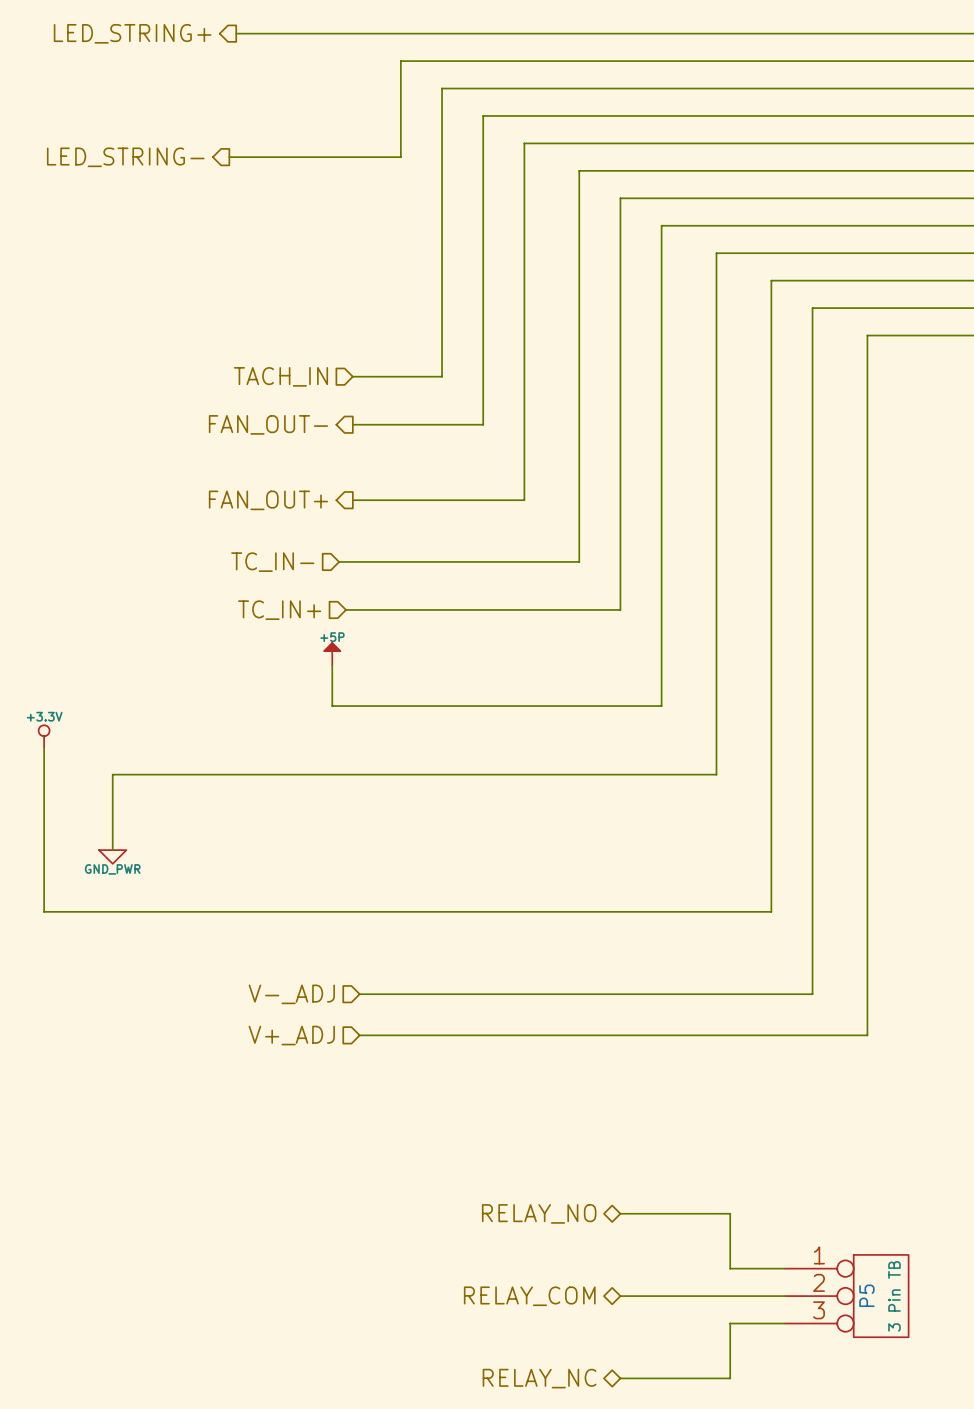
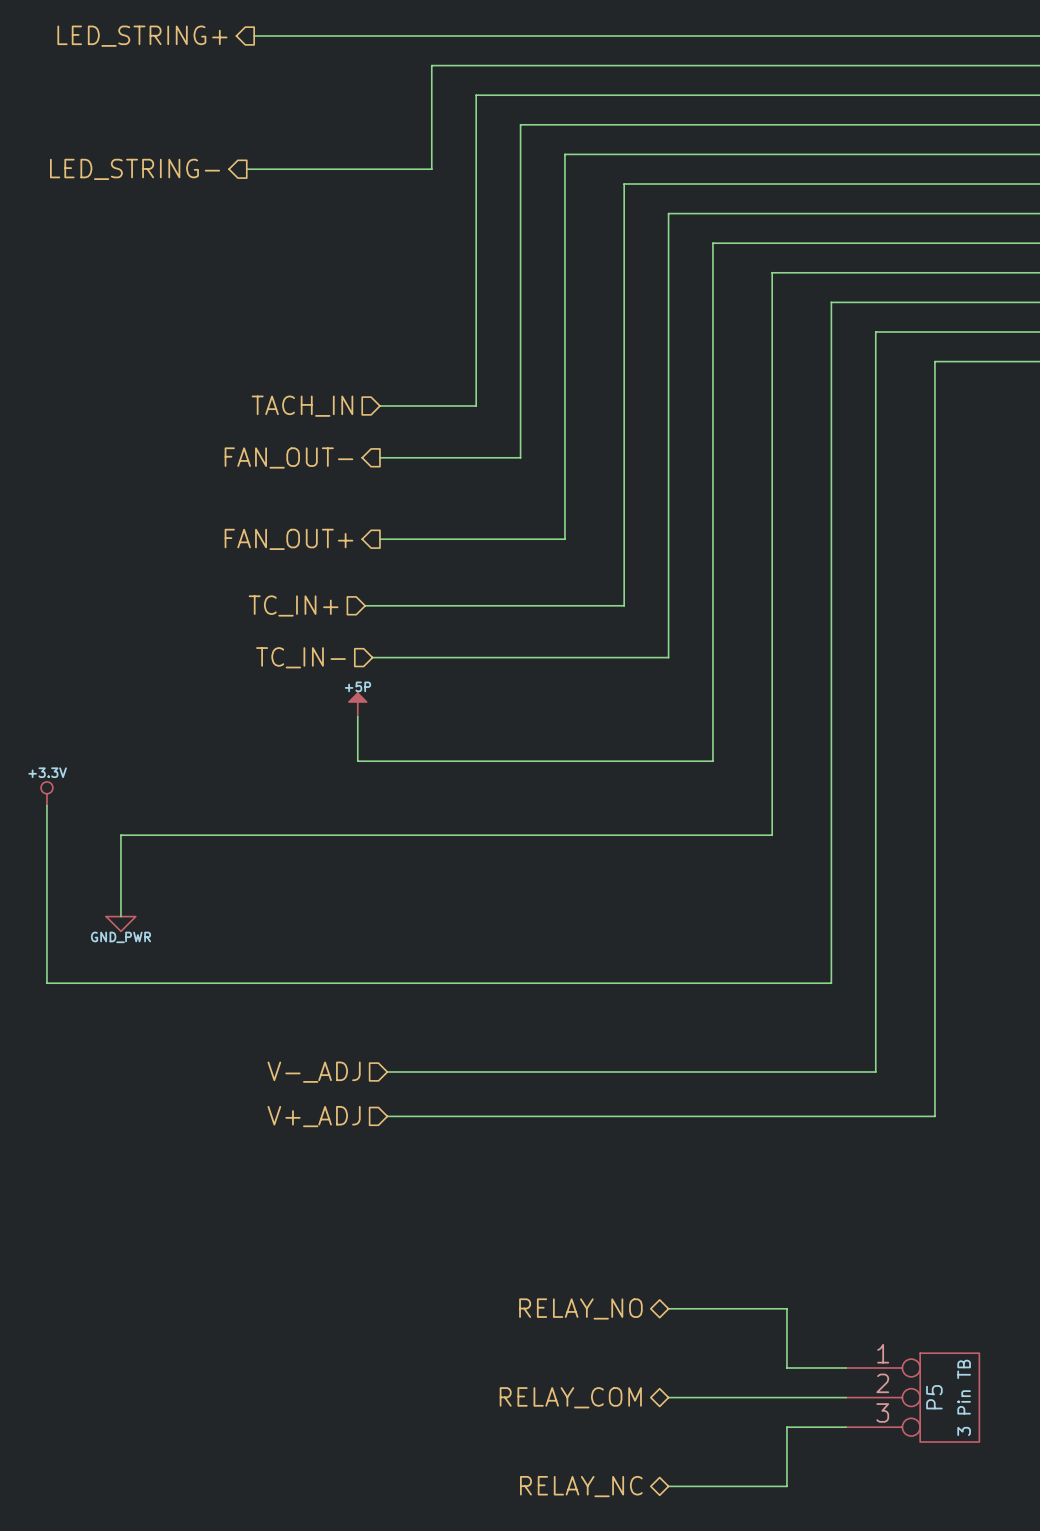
hierarchical label: TC_IN- (272, 562) -> TC_IN+ (293, 605)
hierarchical label: TC_IN+ (279, 610) -> TC_IN- (300, 657)

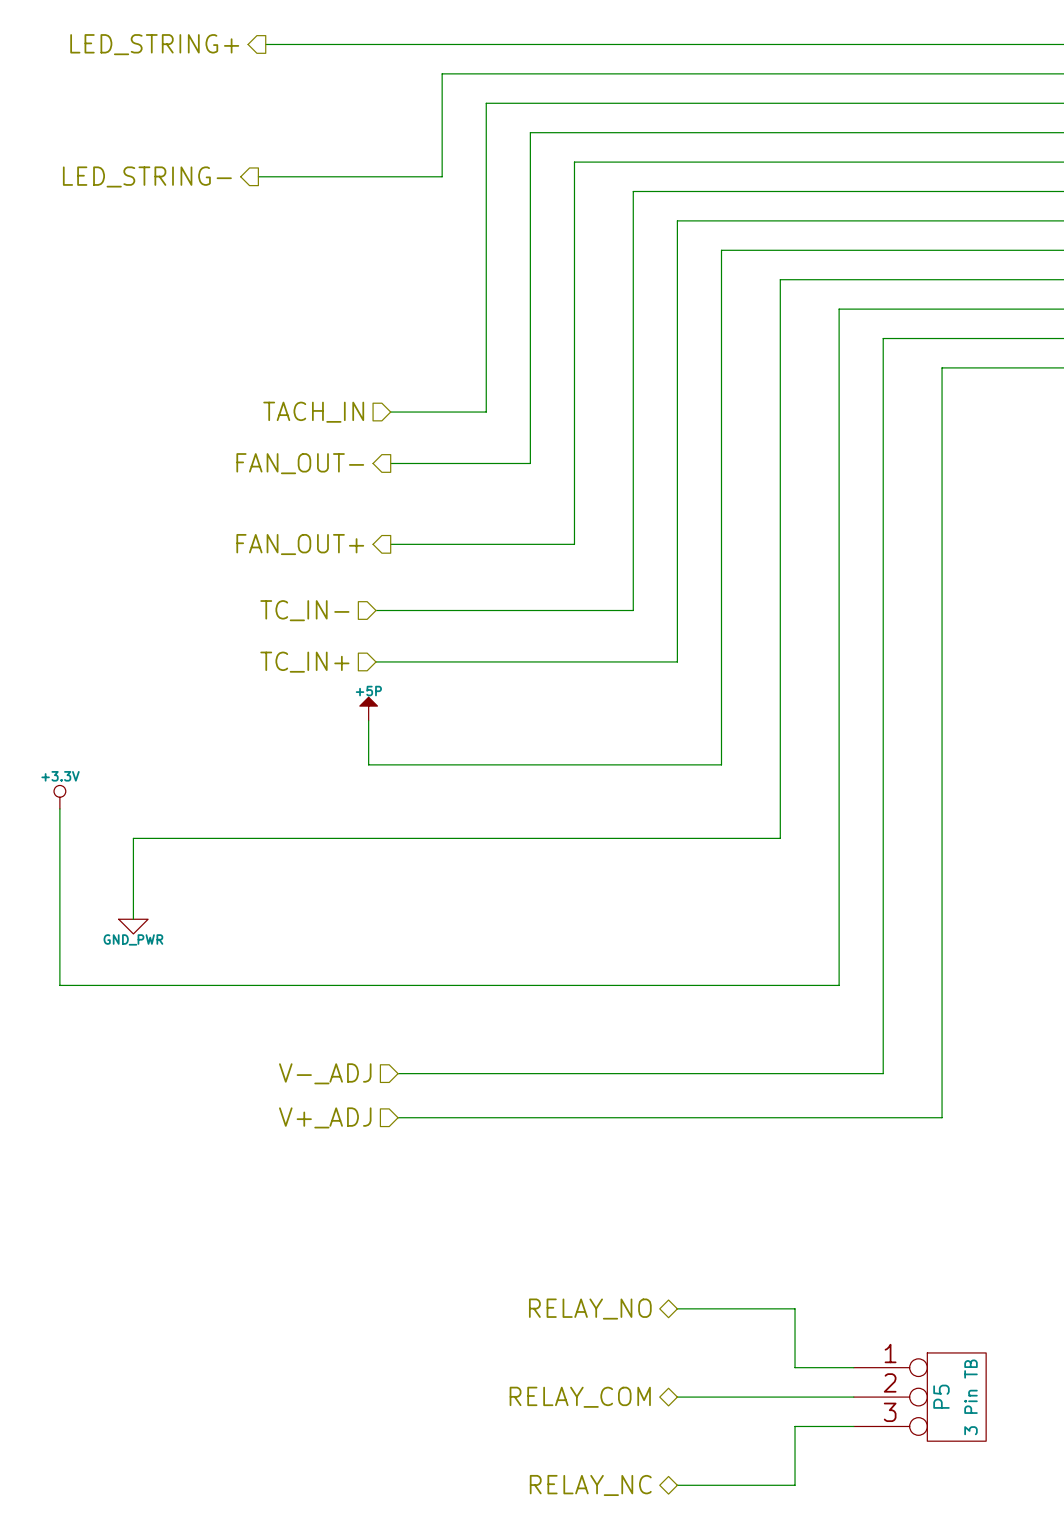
hierarchical label: TC_IN+ (293, 605) -> TC_IN- (304, 610)
hierarchical label: TC_IN- (300, 657) -> TC_IN+ (304, 662)
wire: none -> (375, 661) (383, 661)

